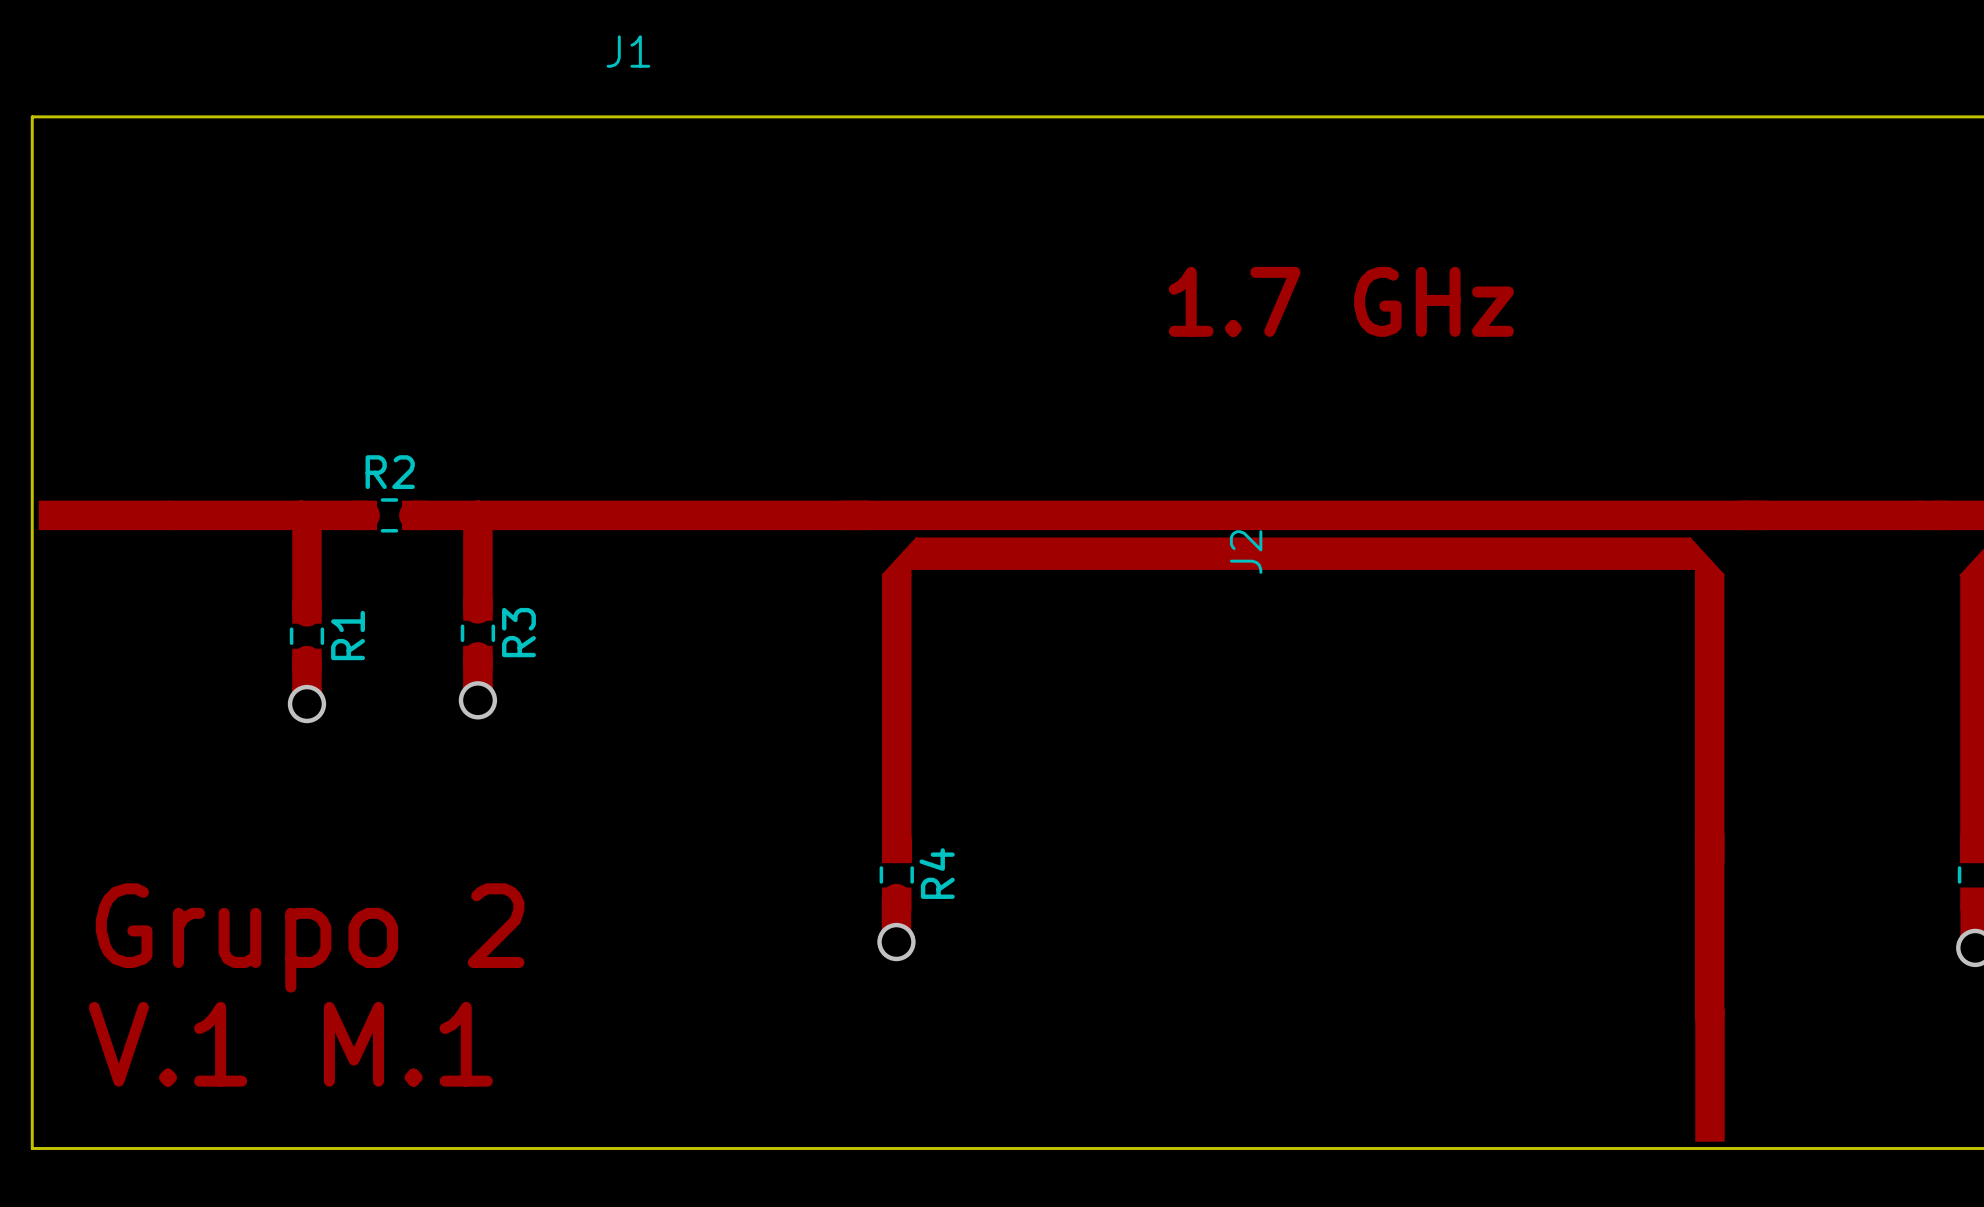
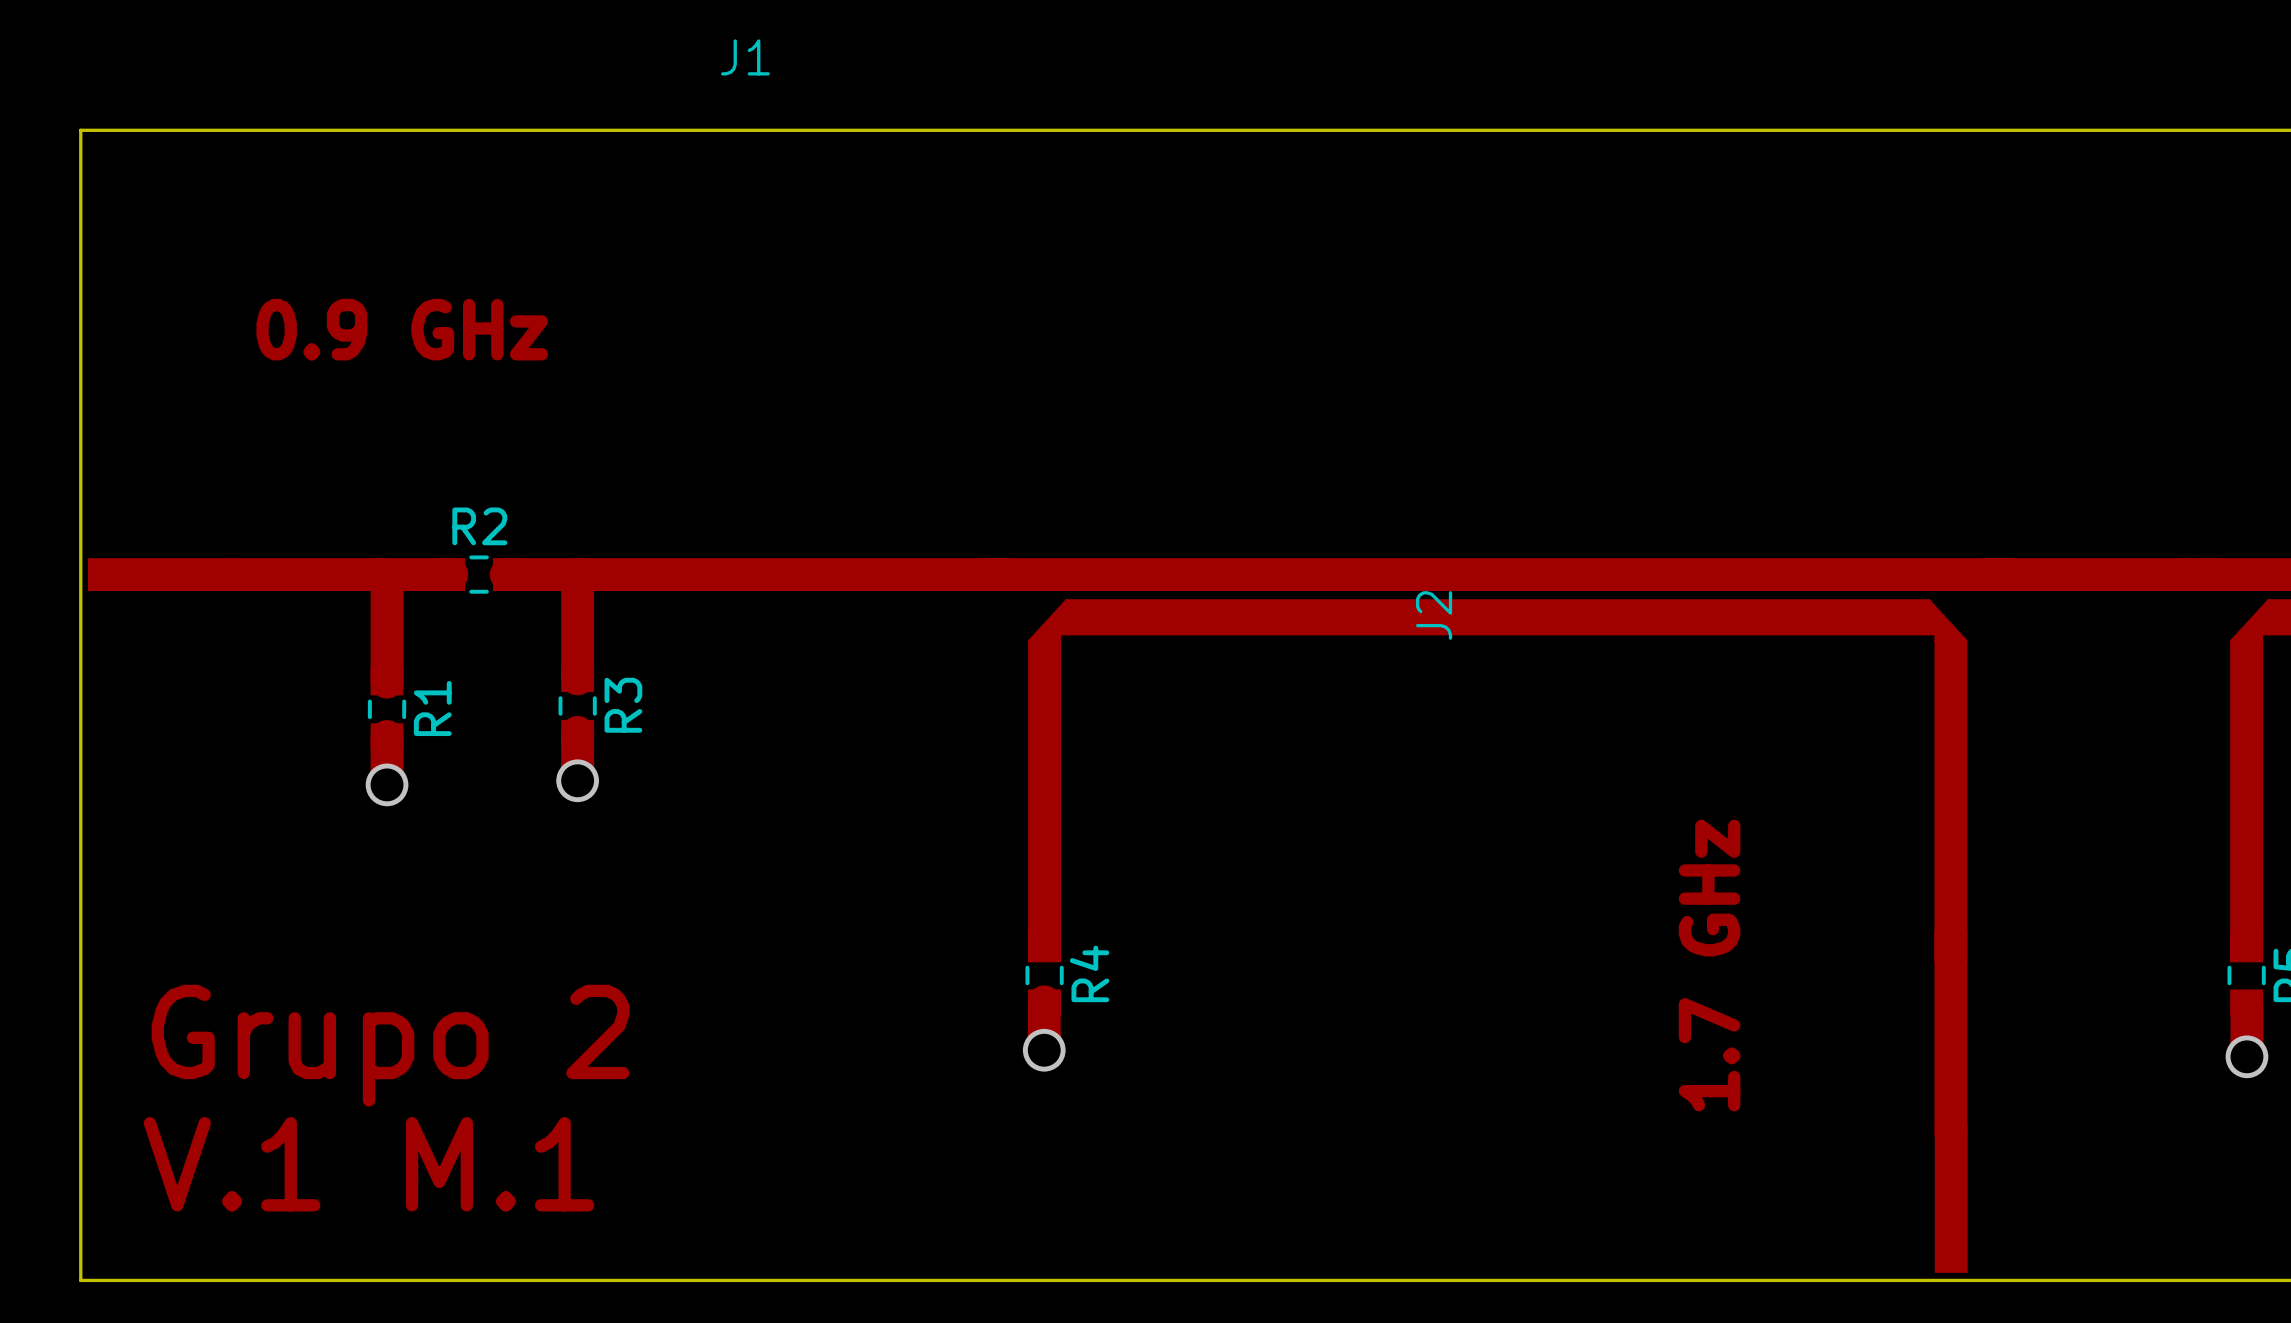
text: none -> 0.9 GHz (402, 329)
text: 1.7 GHz (1341, 301) -> none
text: none -> 1.7 GHz (1709, 965)

